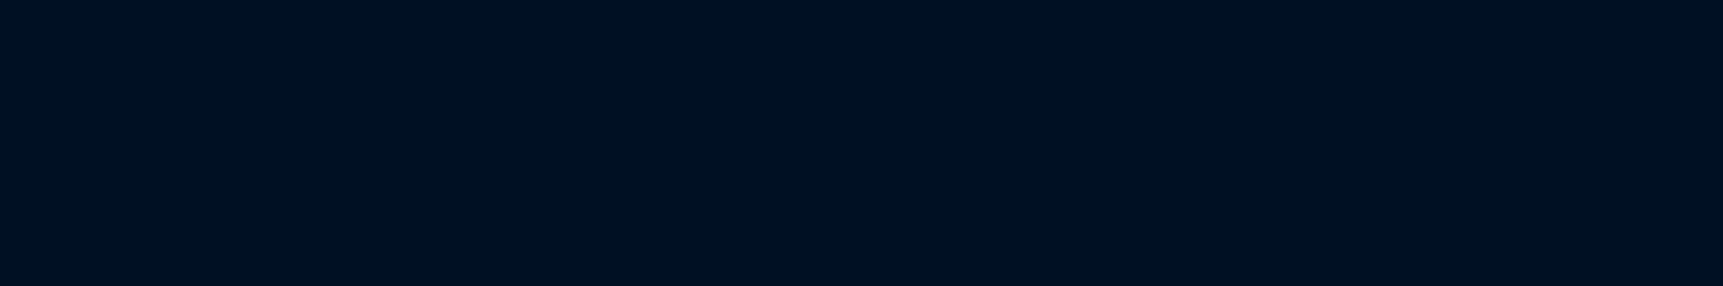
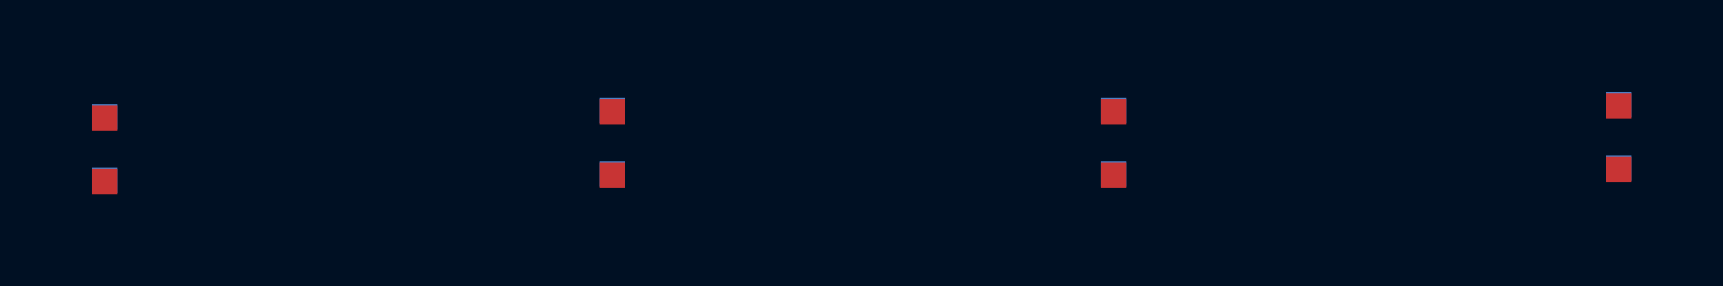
part: none -> (1618, 137)
part: none -> (612, 142)
part: none -> (1113, 142)
part: none -> (104, 149)

